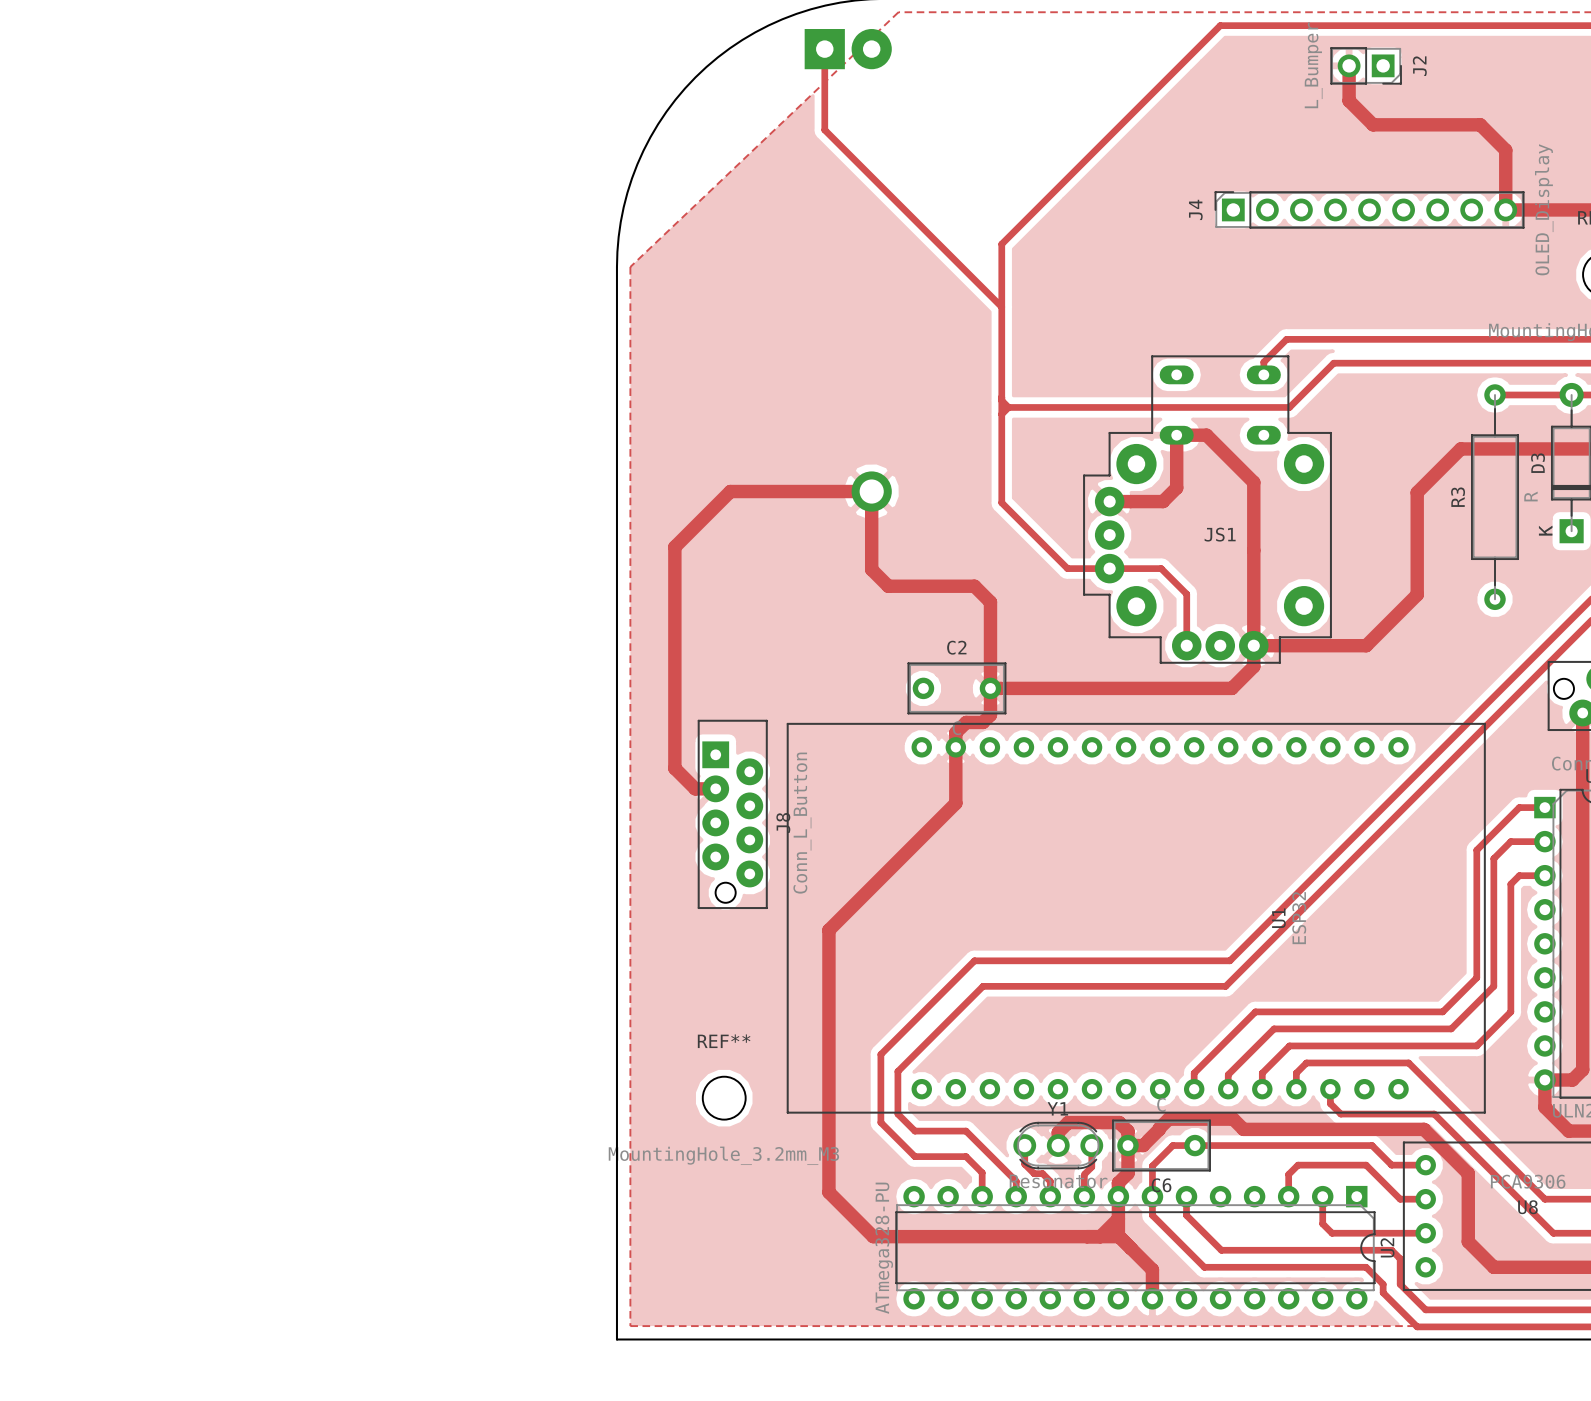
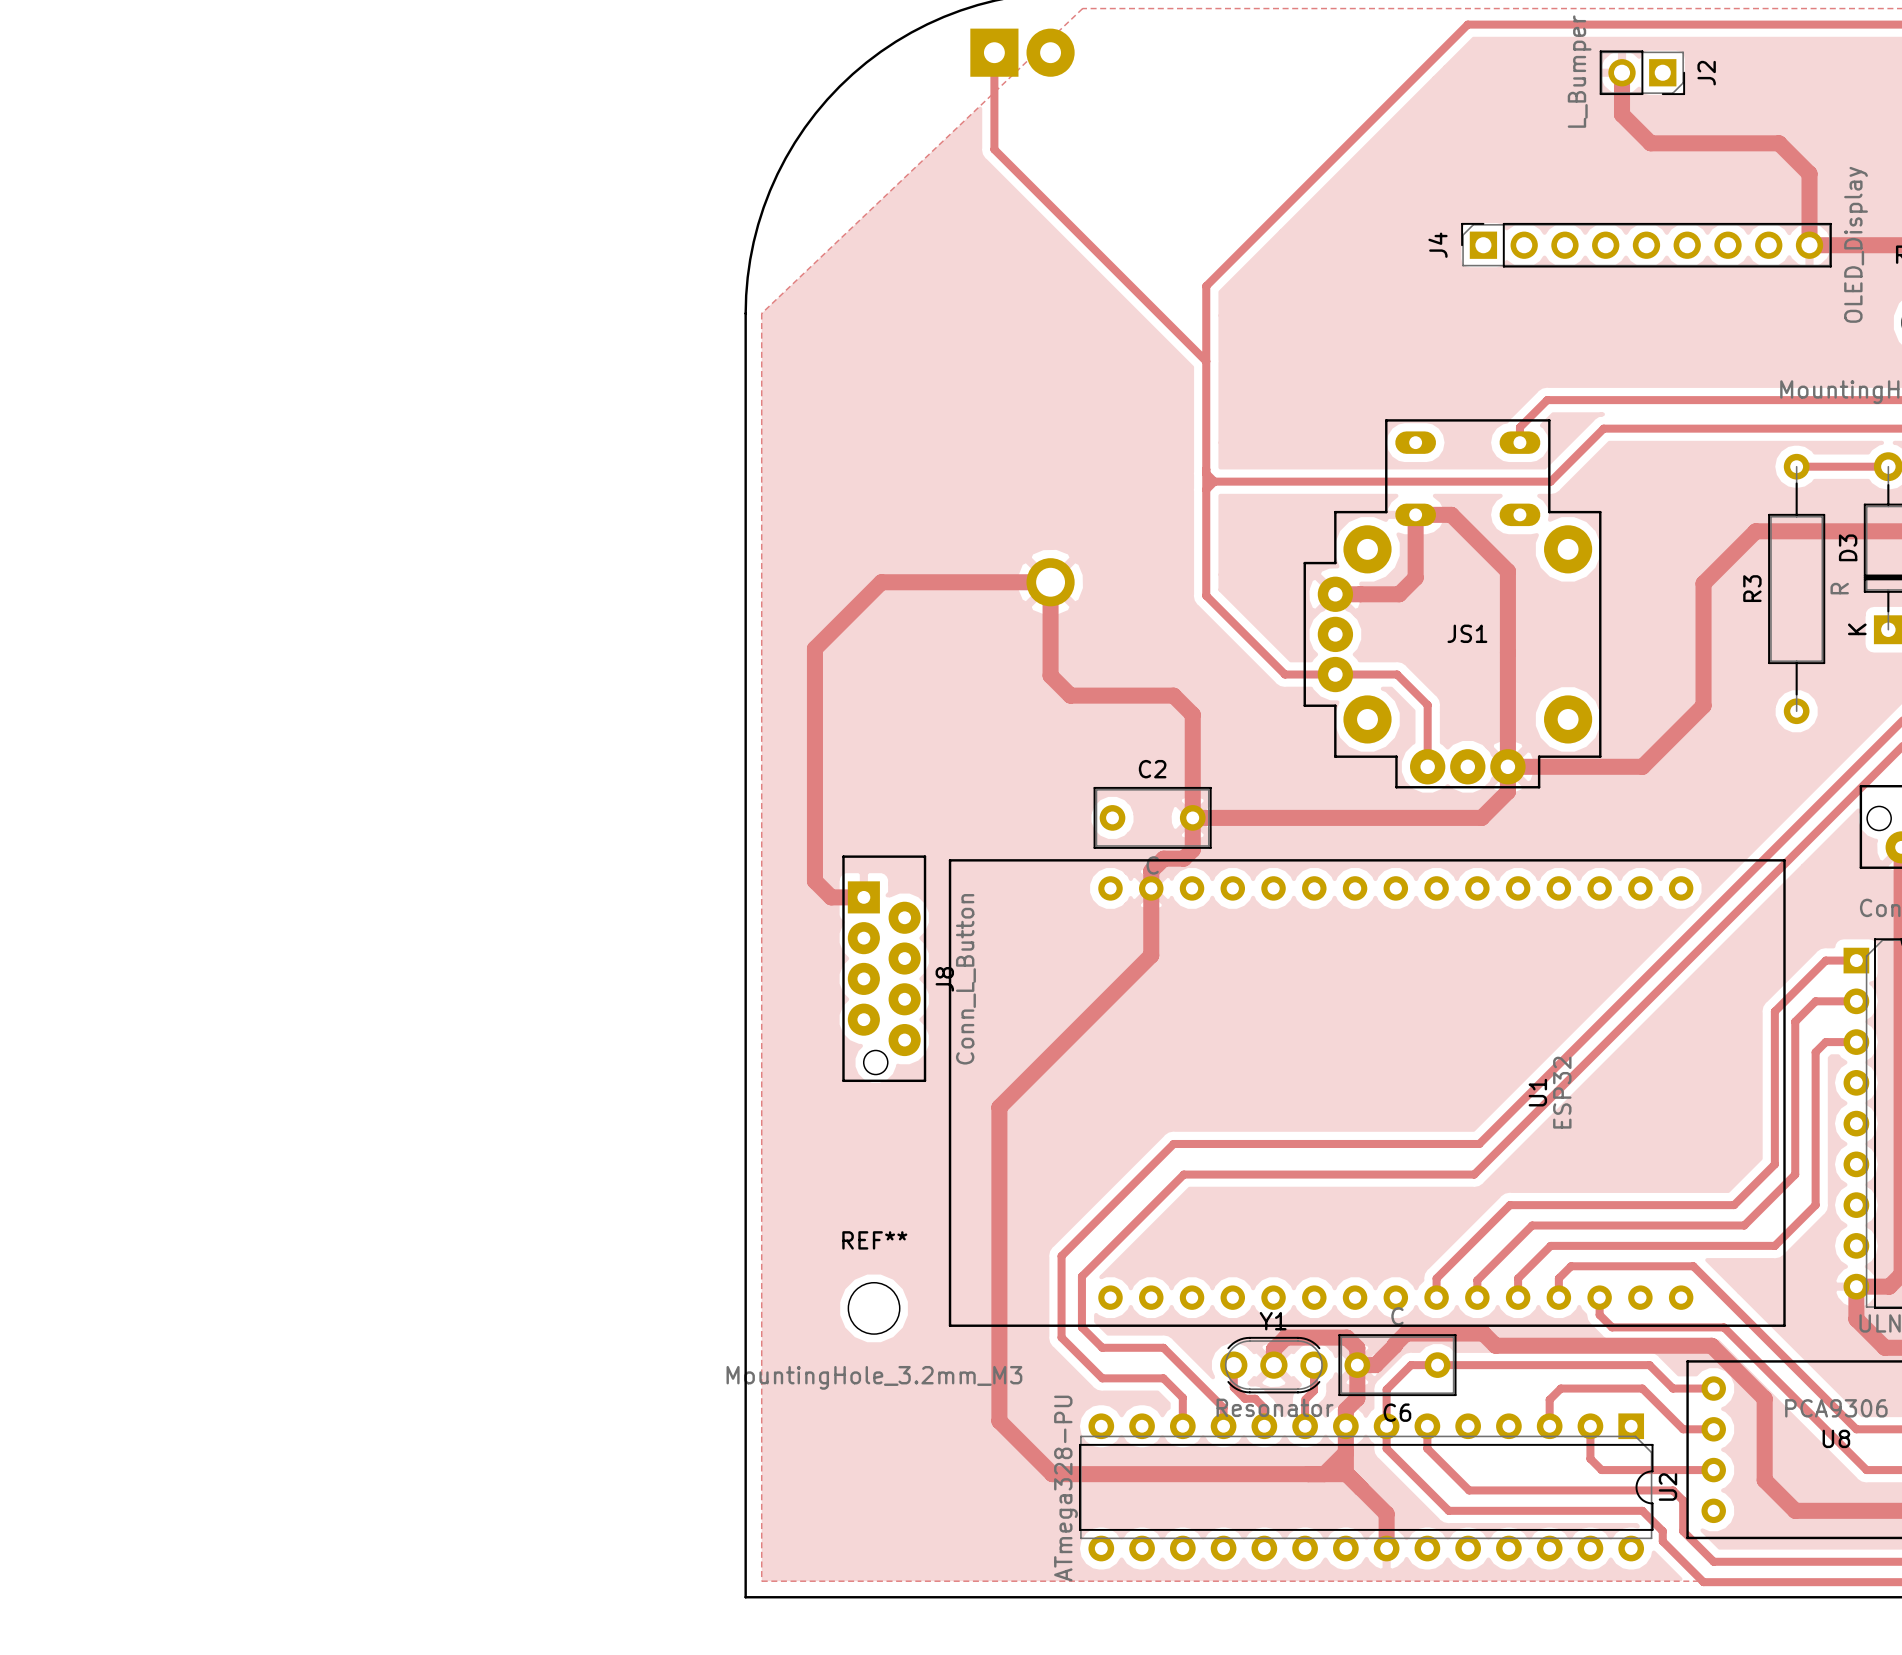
track: (674, 741) (674, 768) (695, 788) (715, 788) -> (814, 881) (831, 897) (863, 897)

